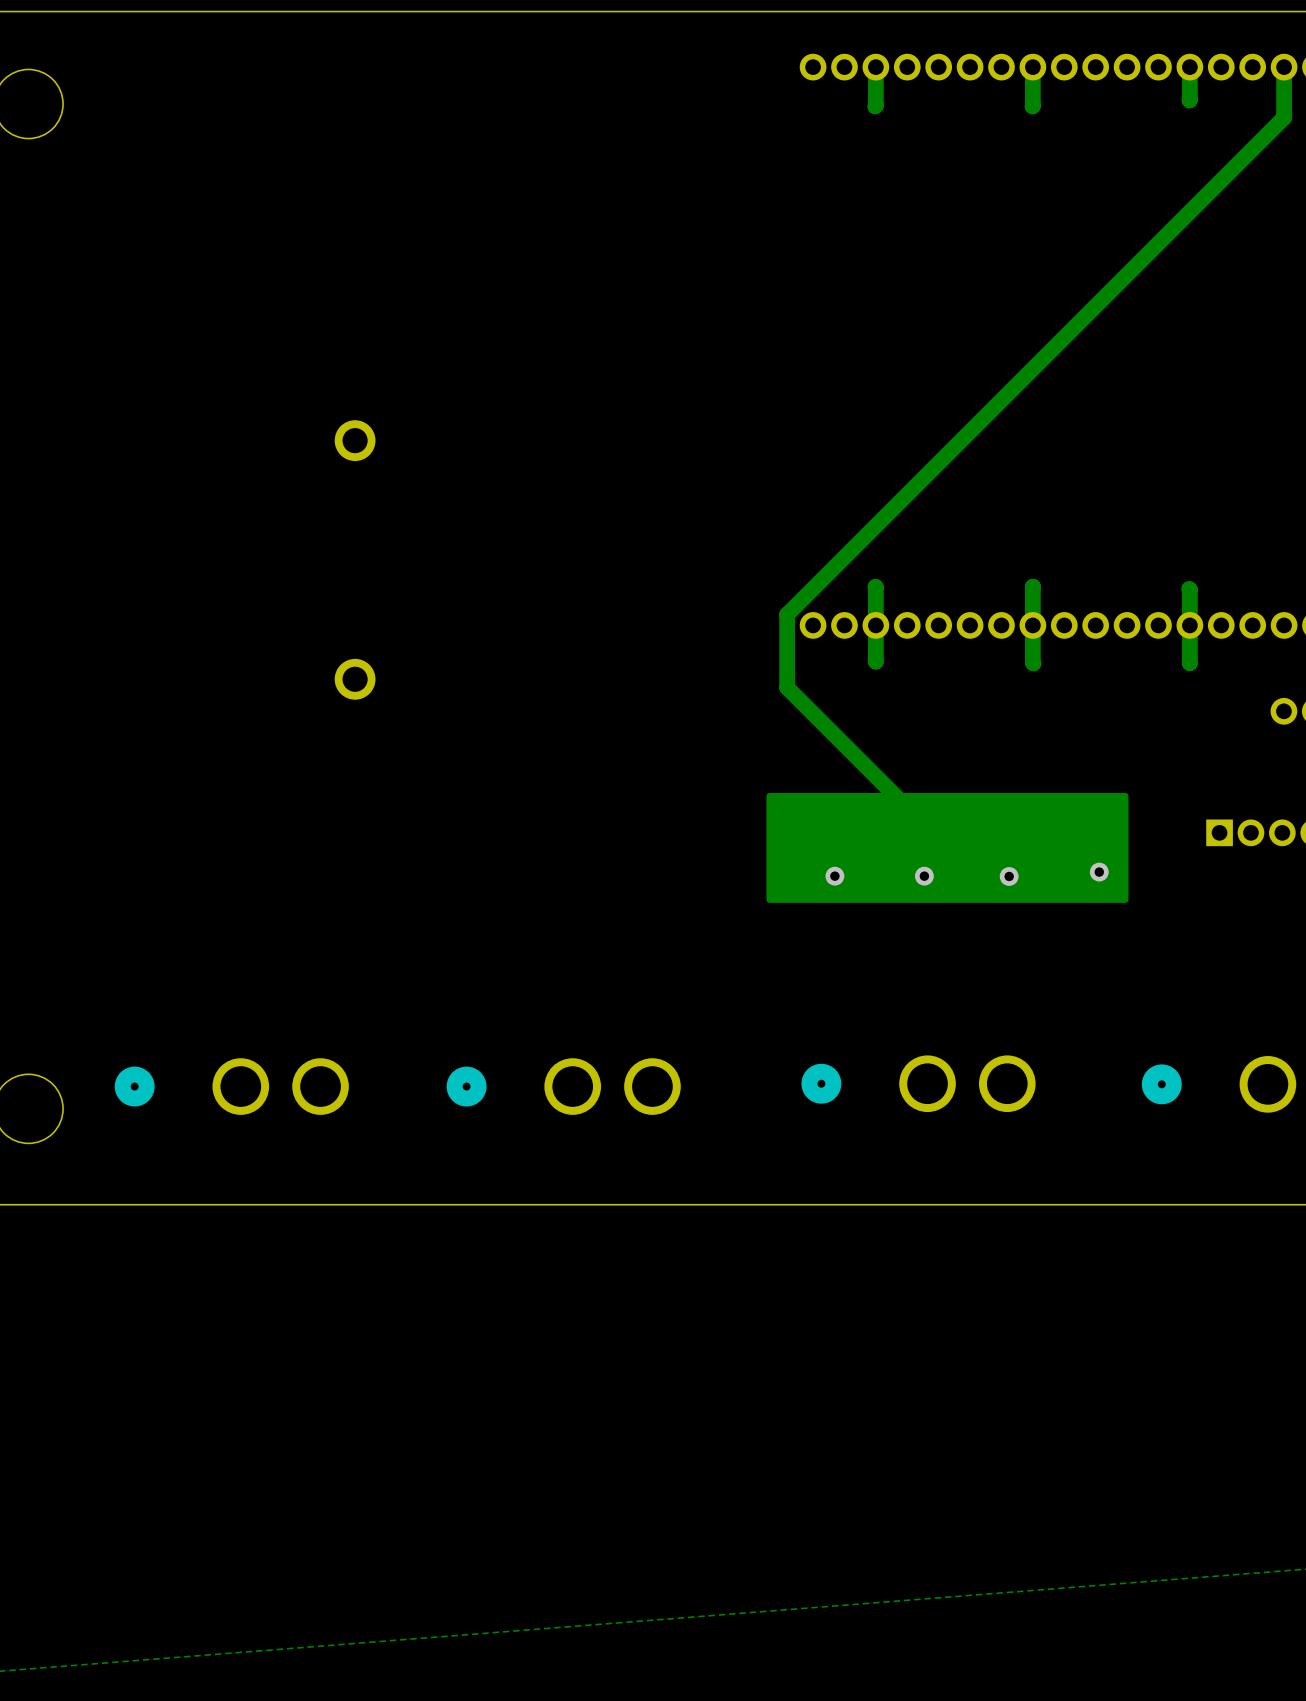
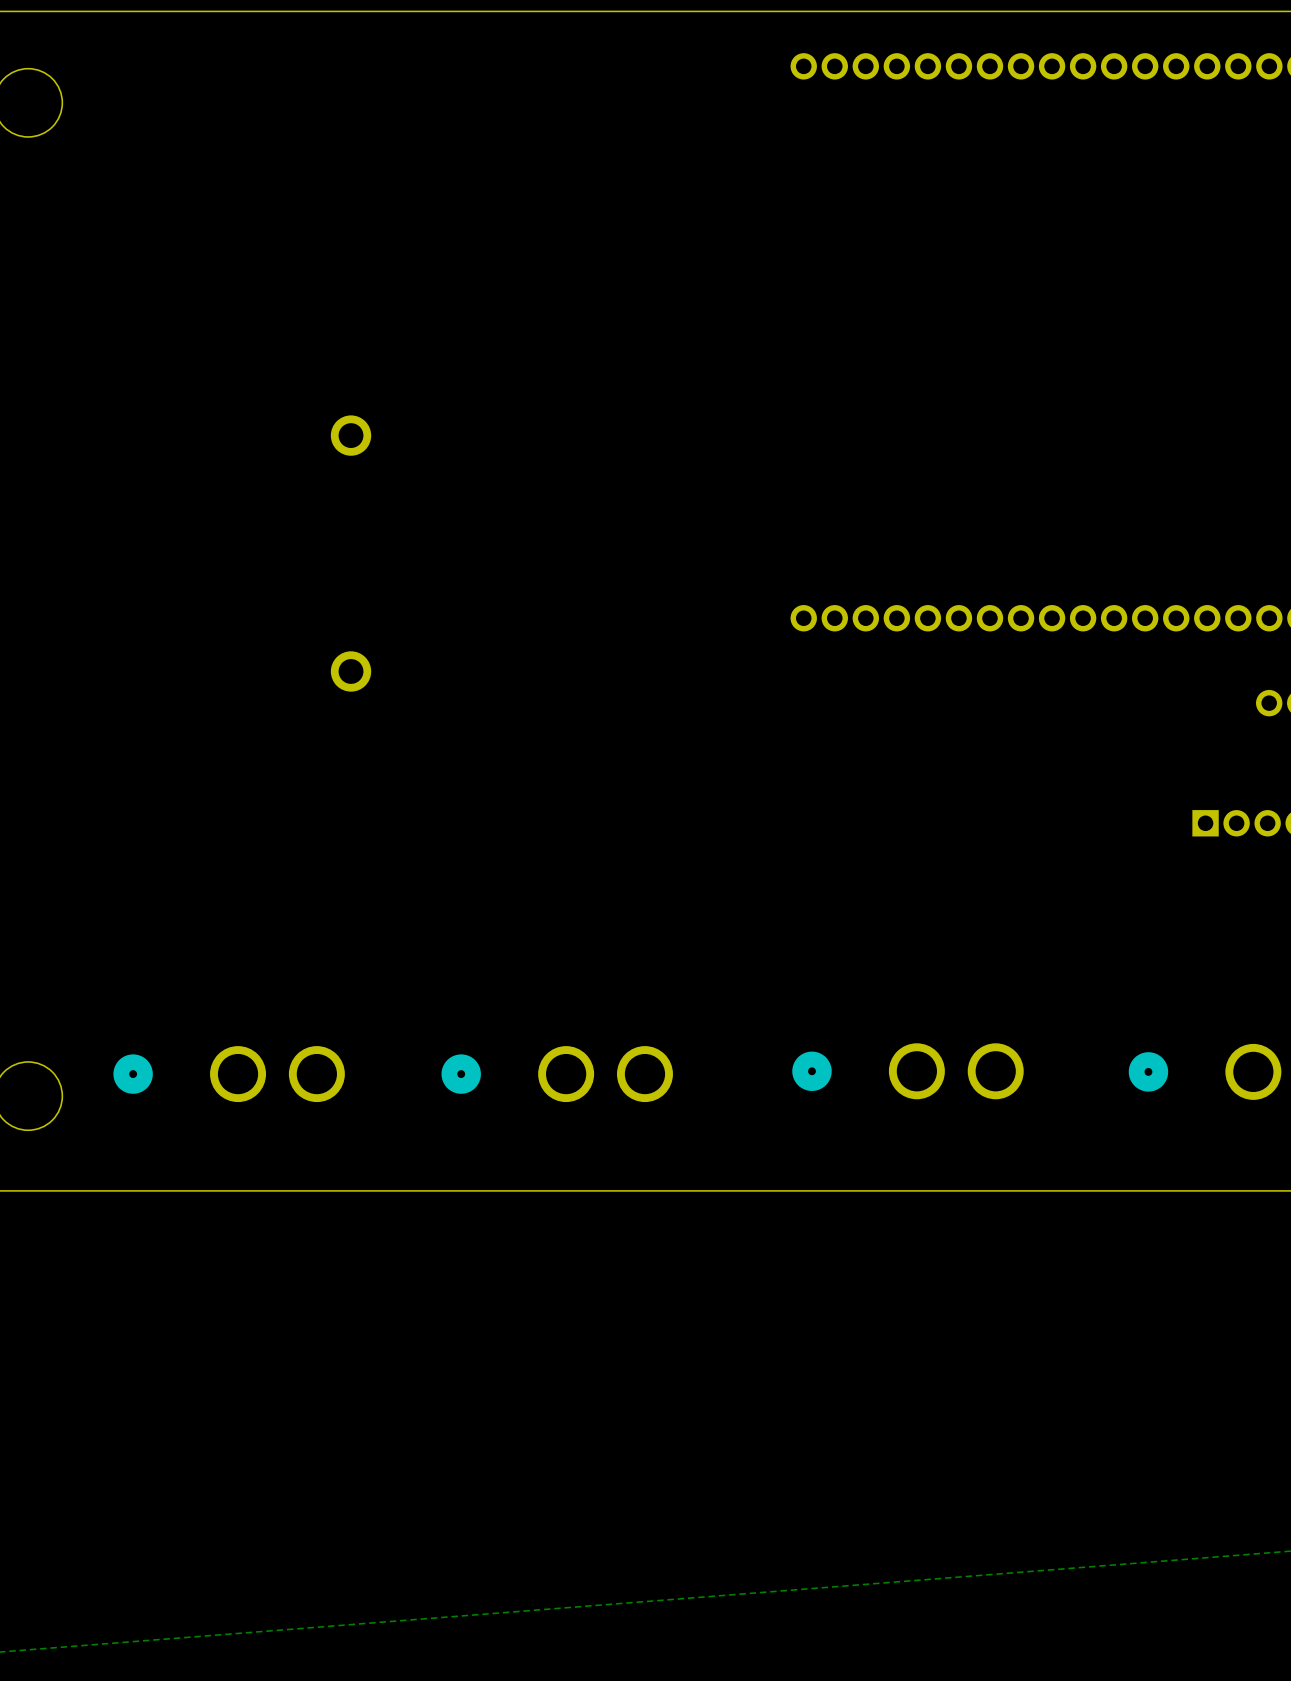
track: (875, 67) (875, 106) -> none
track: (1032, 67) (1032, 106) -> none
track: (1189, 67) (1189, 100) -> none
track: (1284, 67) (1284, 117) (787, 614) (787, 687) (947, 847) -> none
track: (875, 586) (875, 661) -> none
track: (1032, 586) (1033, 663) -> none
track: (1189, 588) (1189, 663) -> none
drawing: [766, 792, 1129, 903] -> none
via: (1099, 872) -> none
via: (834, 876) -> none
via: (924, 876) -> none
via: (1009, 876) -> none

